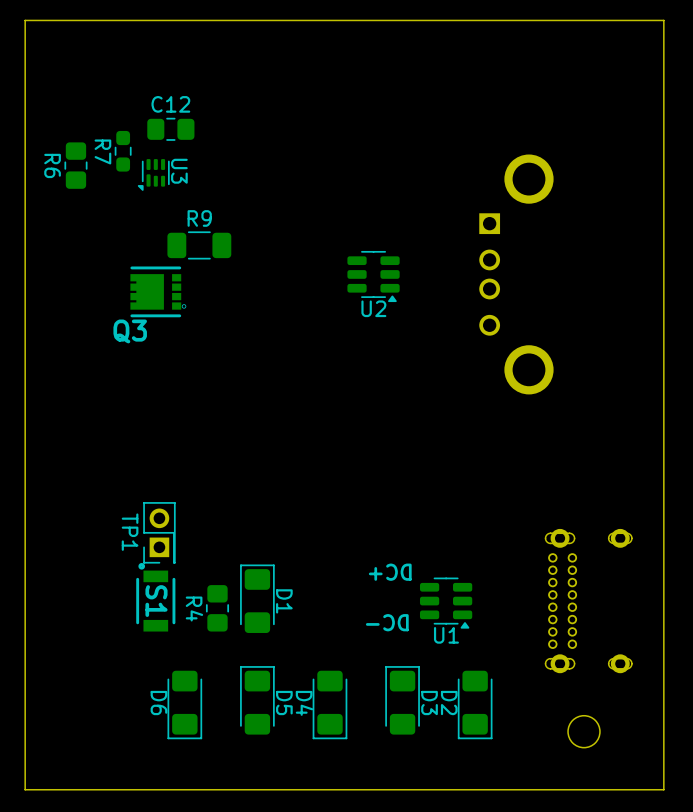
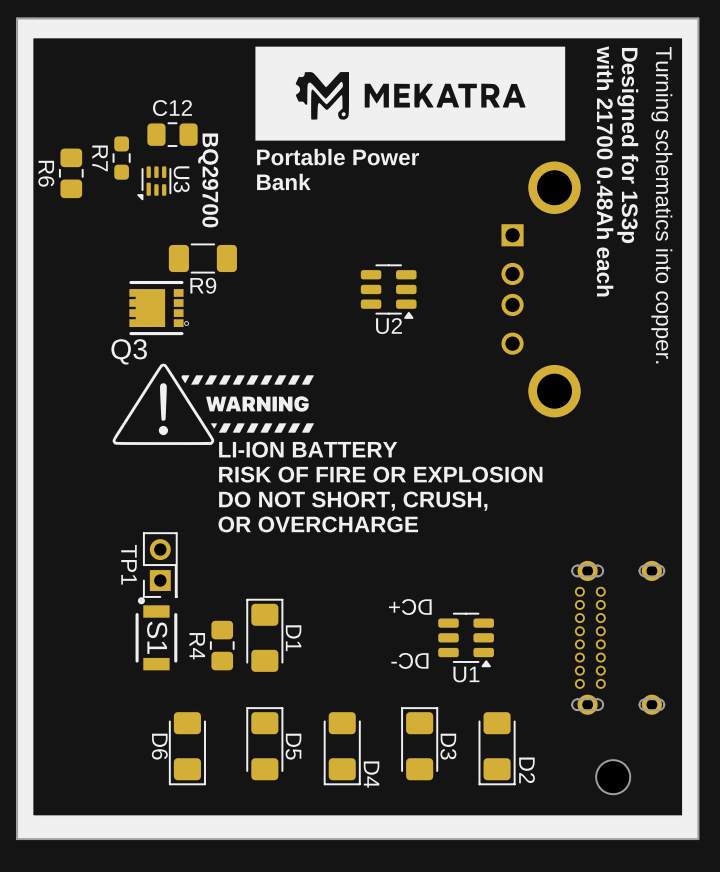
drawing: none -> [16, 17, 700, 840]
text: none -> Portable Power (338, 157)
text: none -> Designed for 1S3p (627, 145)
U3 value: none -> BQ29700 (208, 180)
text: none -> Bank (283, 182)
text: none -> with 21700 0.48Ah each (605, 171)
R9 name position: R9 (199, 218) -> R9 (203, 285)
text: none -> Turning schematics into copper. (661, 205)
drawing: none -> [112, 363, 315, 445]
text: none -> LI-ION BATTERY (308, 449)
text: none -> RISK OF FIRE OR EXPLOSION (380, 474)
text: none -> DO NOT SHORT, CRUSH, (353, 501)
text: none -> OR OVERCHARGE (318, 524)
D4 name position: D4 (304, 703) -> D4 (371, 774)
D2 name position: D2 (449, 703) -> D2 (527, 770)

